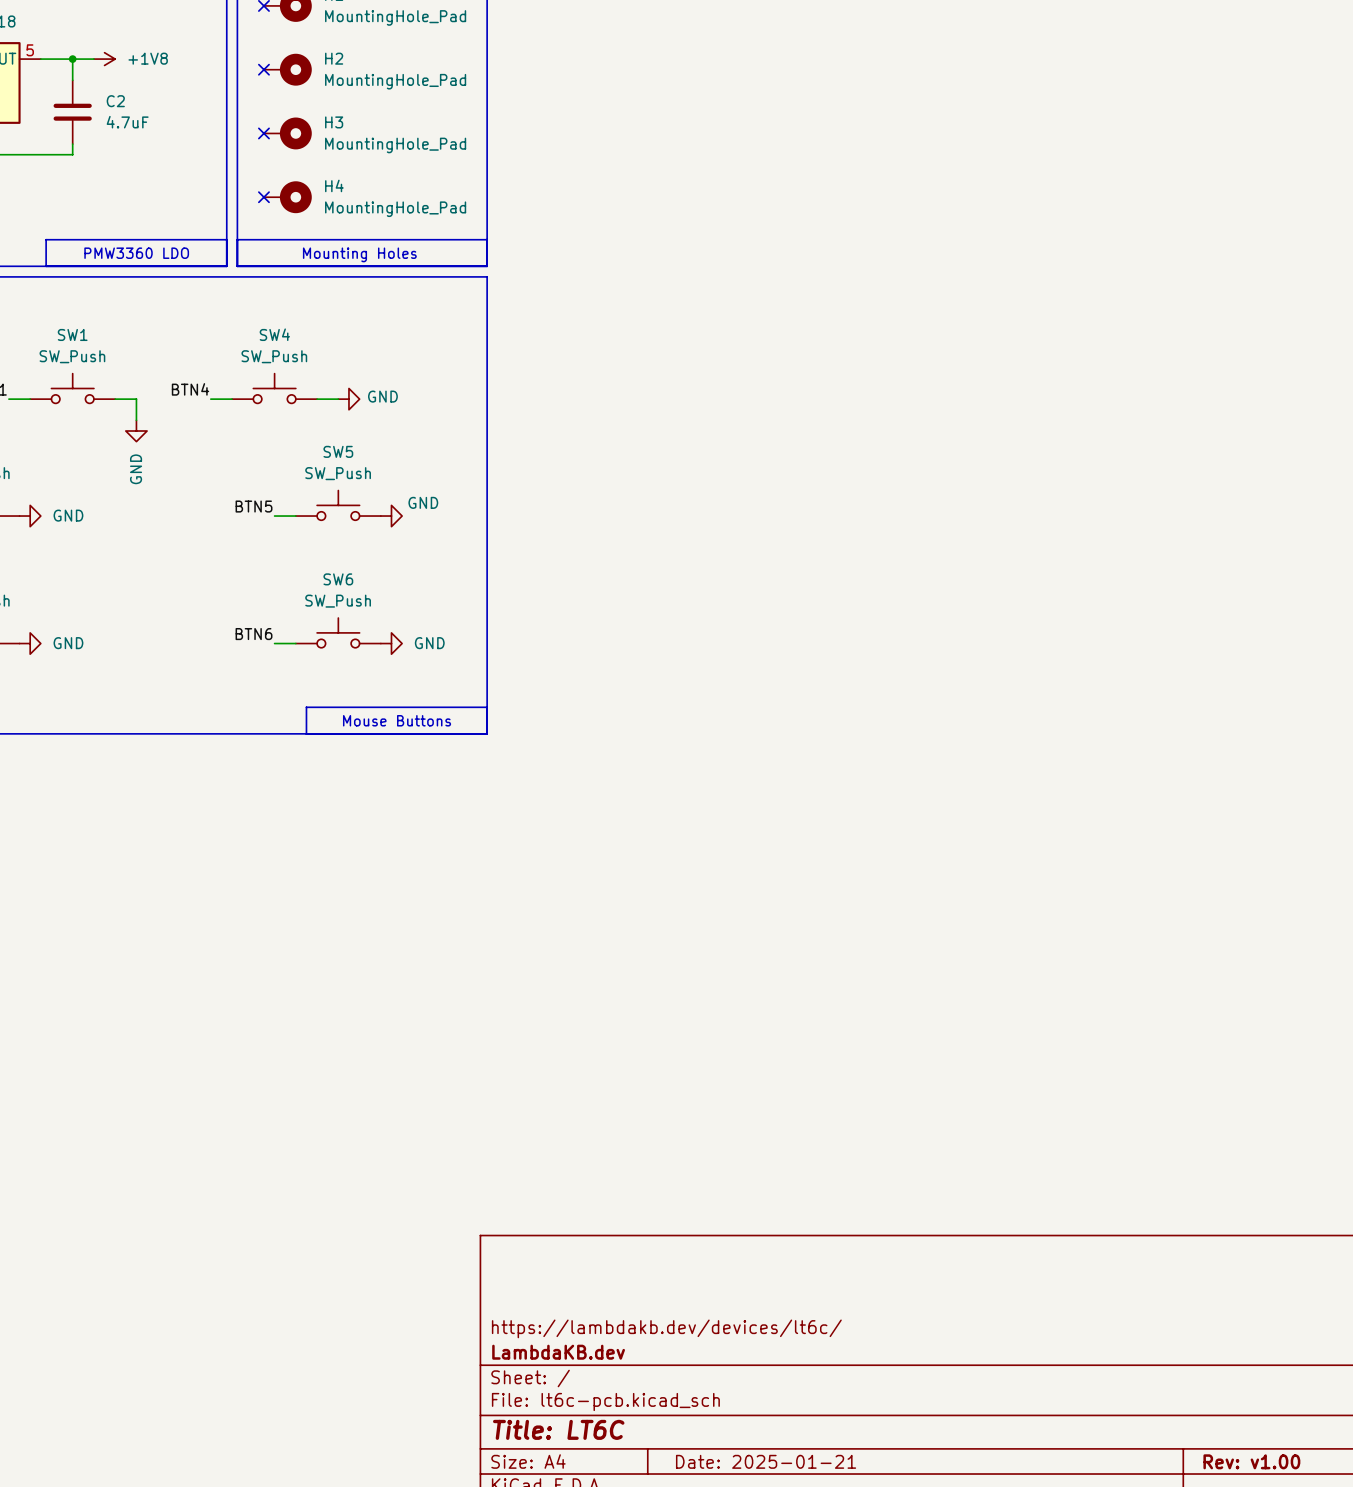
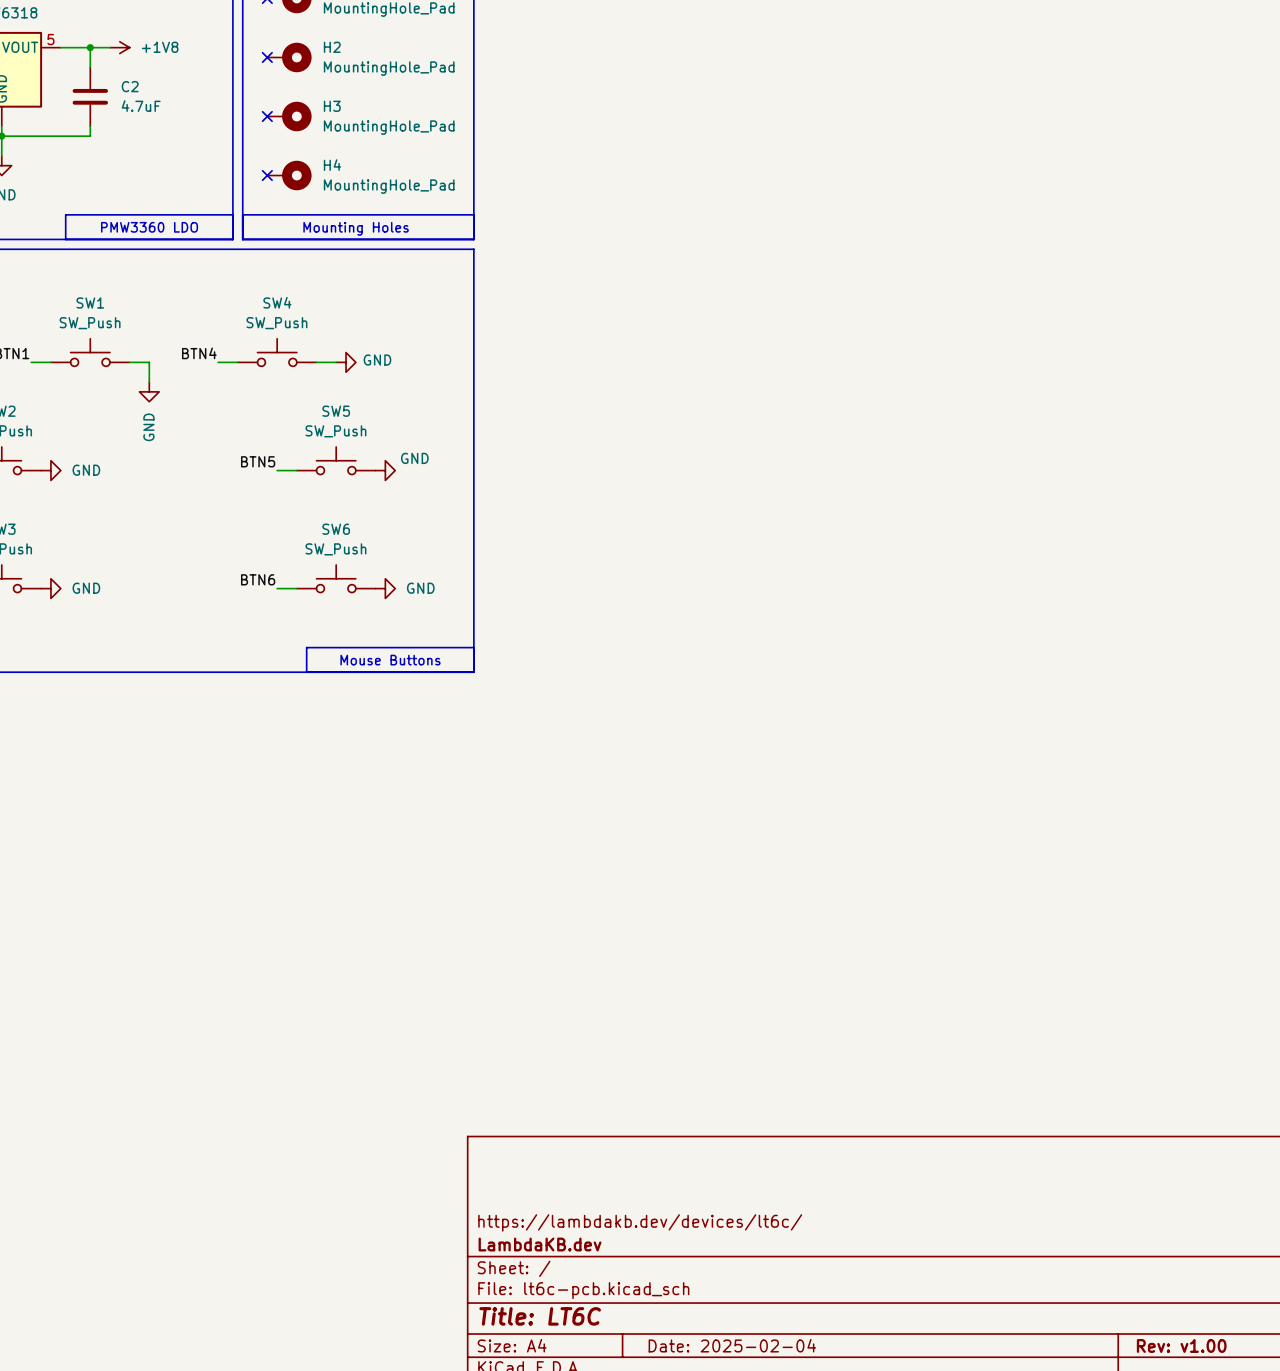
title block: Date: 2025-01-21 (766, 1461) -> Date: 2025-02-04 (732, 1345)

